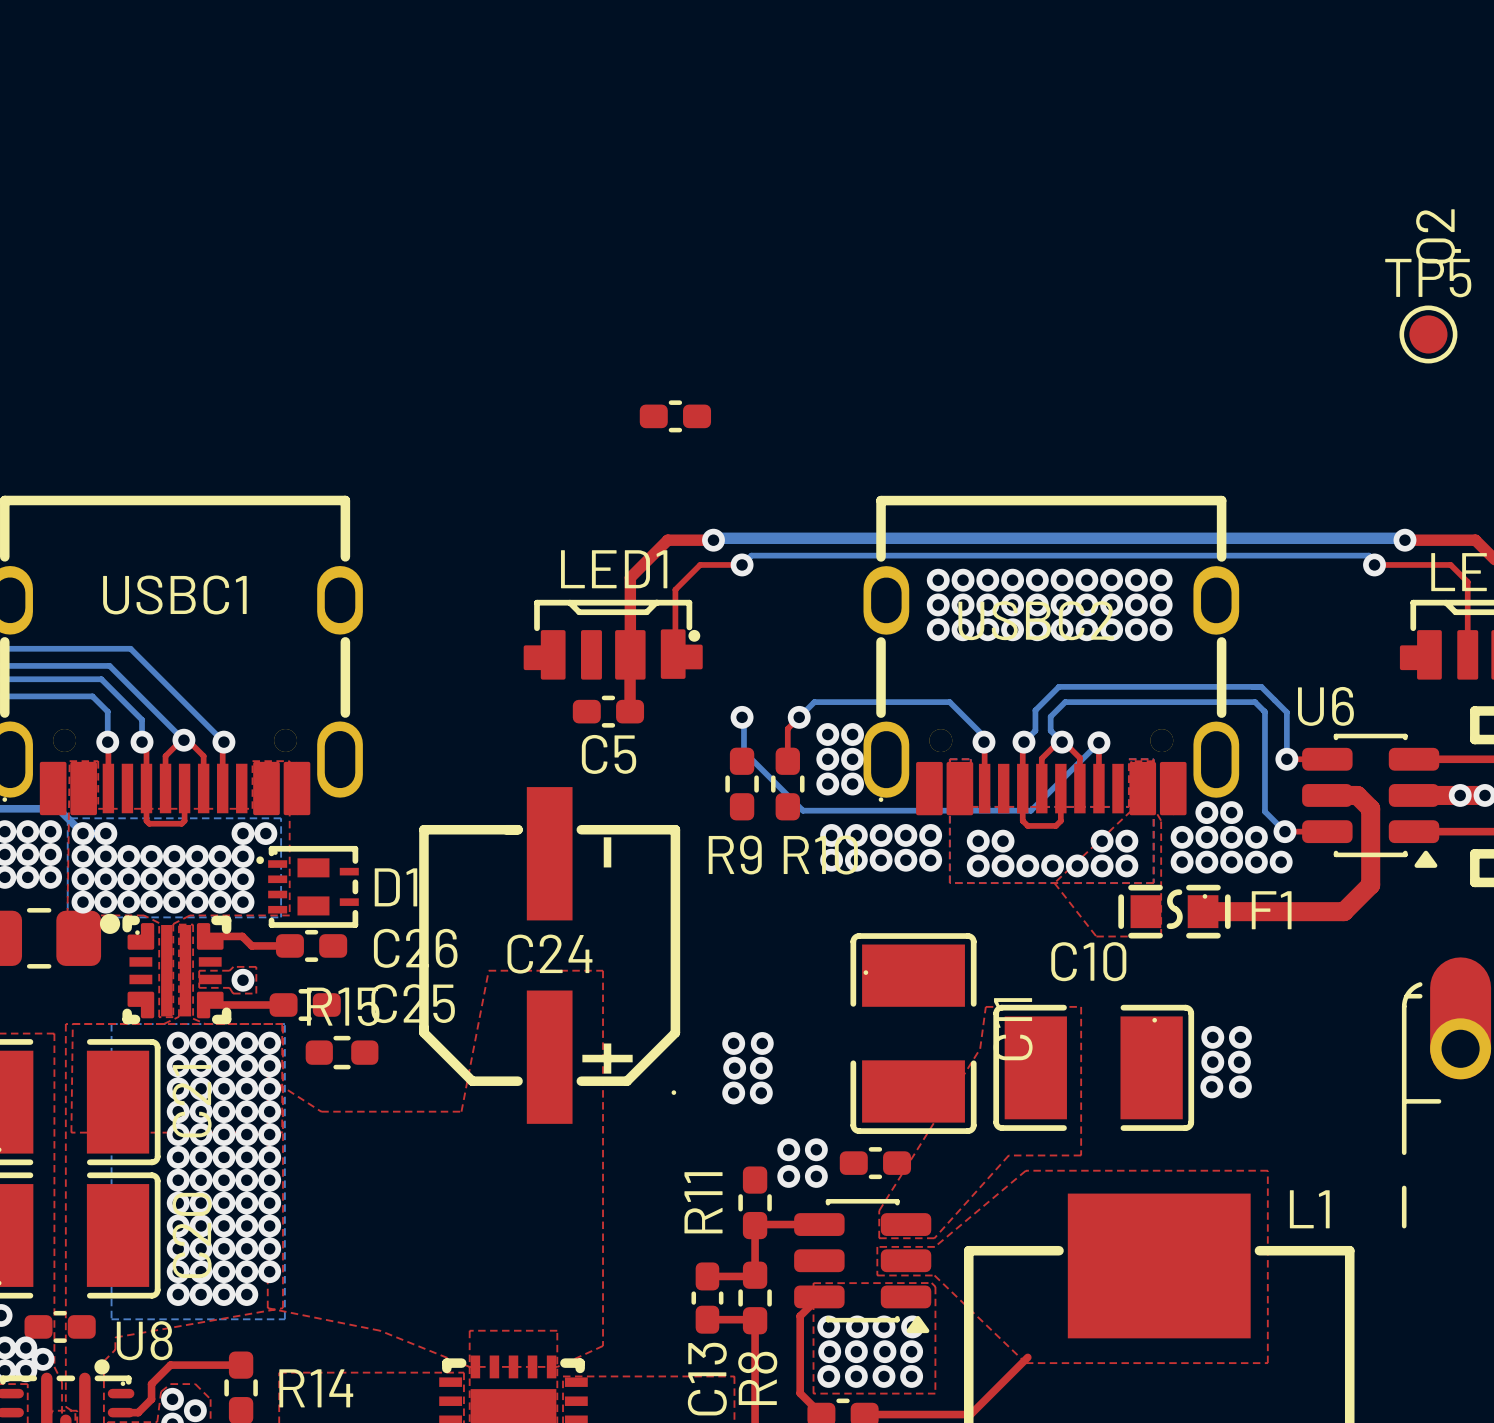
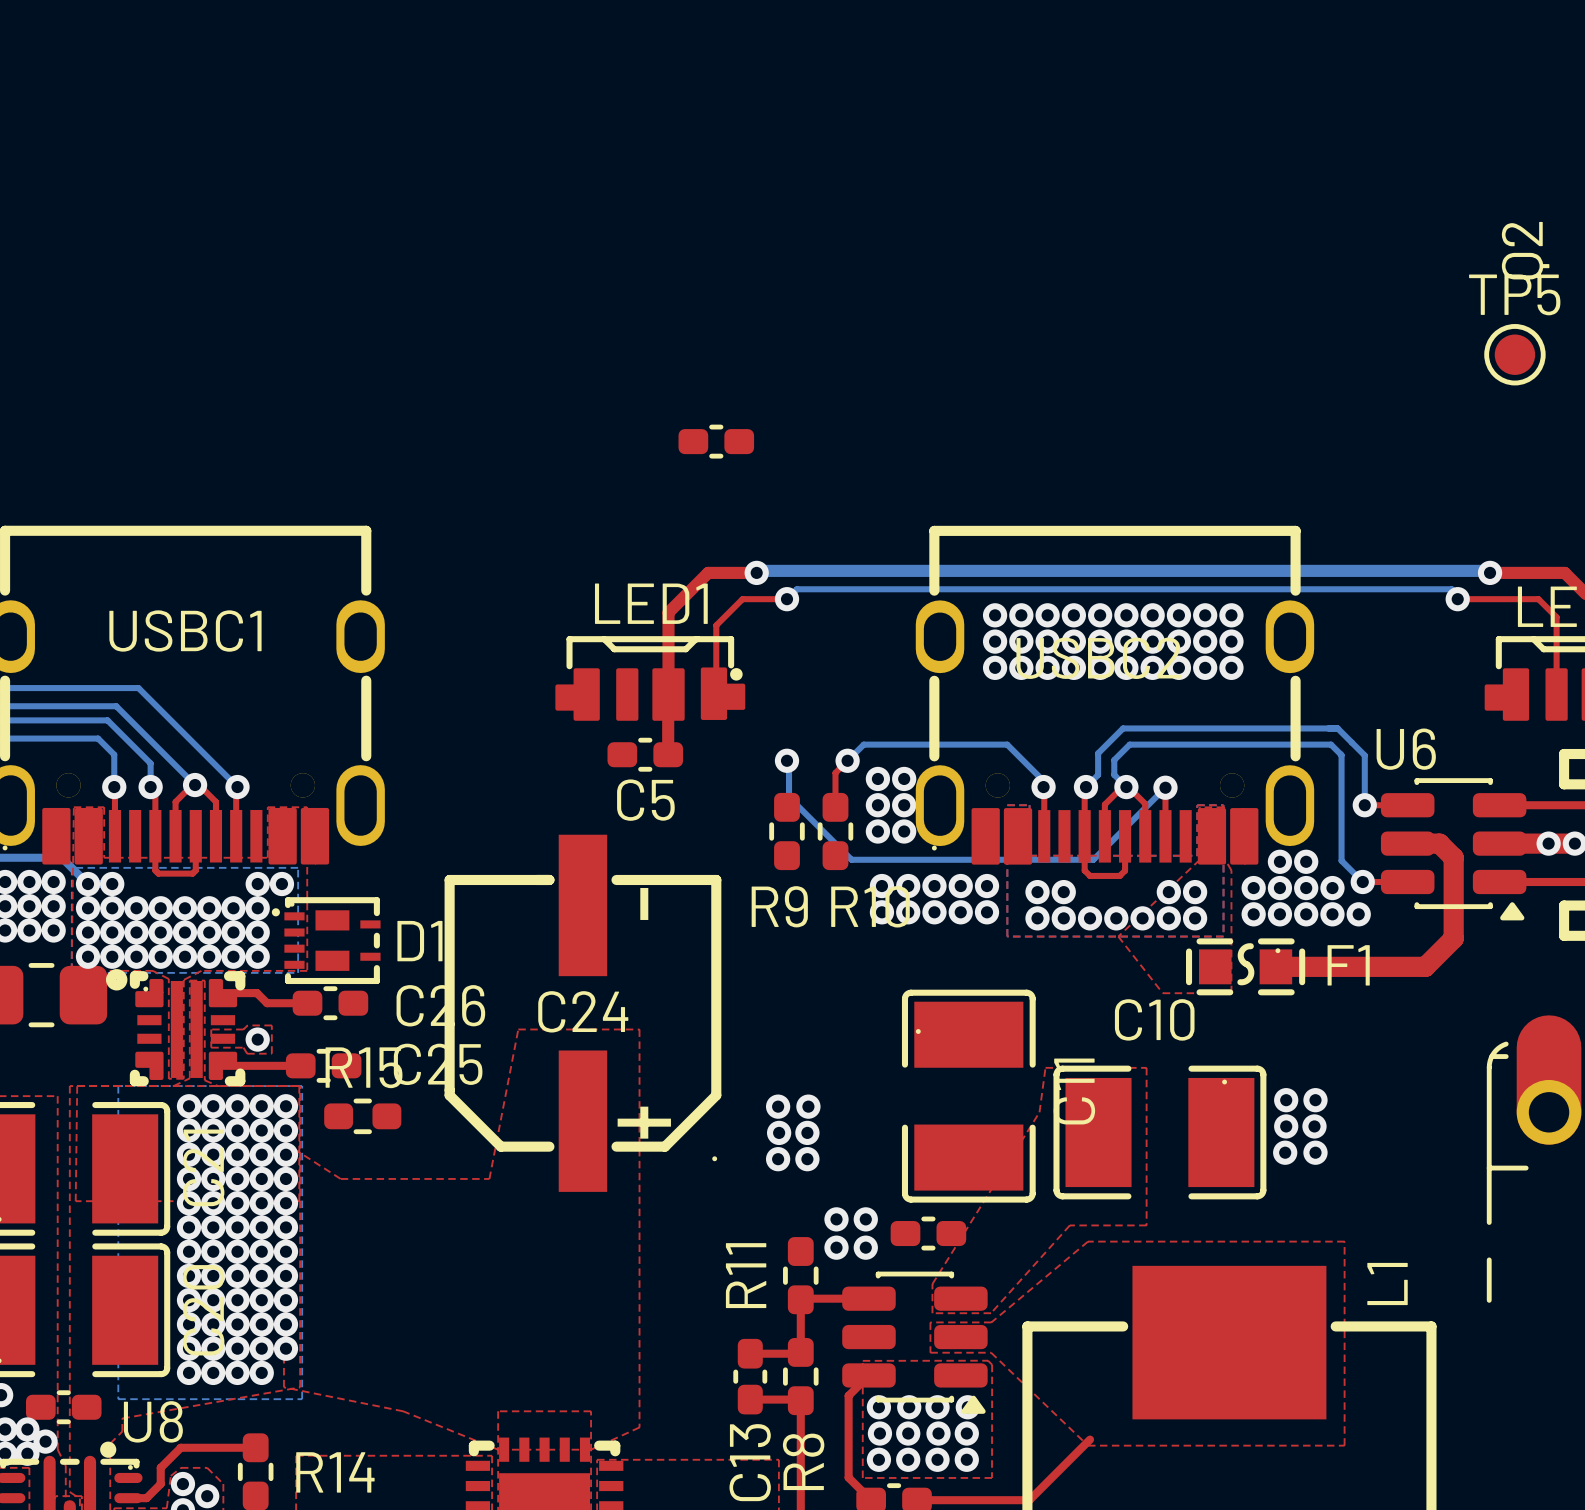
L1 name rotation: 0° (1309, 1209) -> 90° counterclockwise (1387, 1283)

